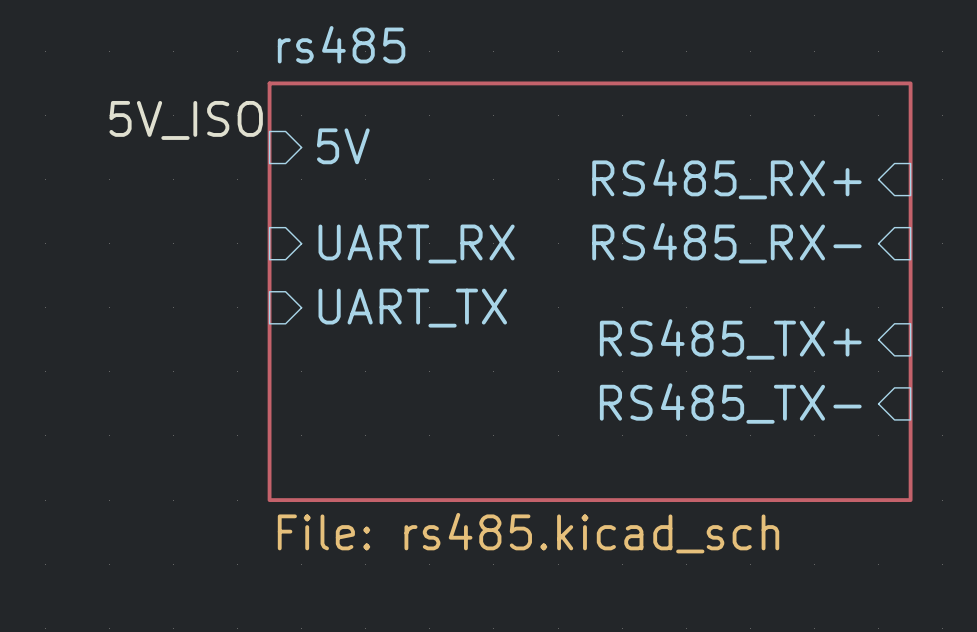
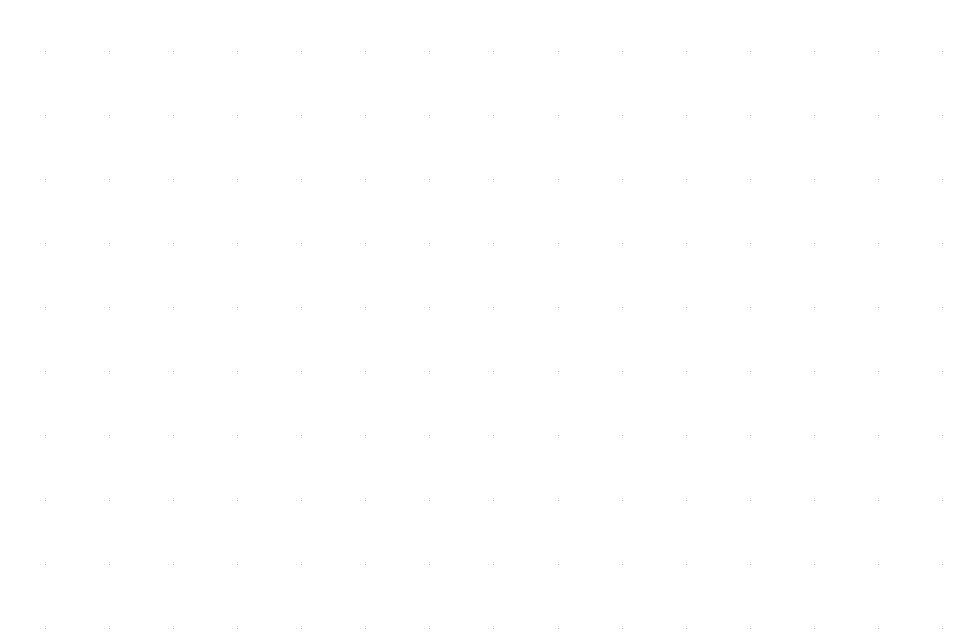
label: 5V_ISO (186, 120) -> none
sheet pin: 5V (343, 146) -> none
sheet pin: RS485_RX+ (726, 179) -> none
sheet pin: RS485_RX- (726, 243) -> none
sheet pin: UART_RX (416, 244) -> none
sheet rs485: File: rs485.kicad_sch (590, 291) -> none
sheet pin: UART_TX (412, 308) -> none
sheet pin: RS485_TX+ (730, 339) -> none
sheet pin: RS485_TX- (730, 403) -> none

